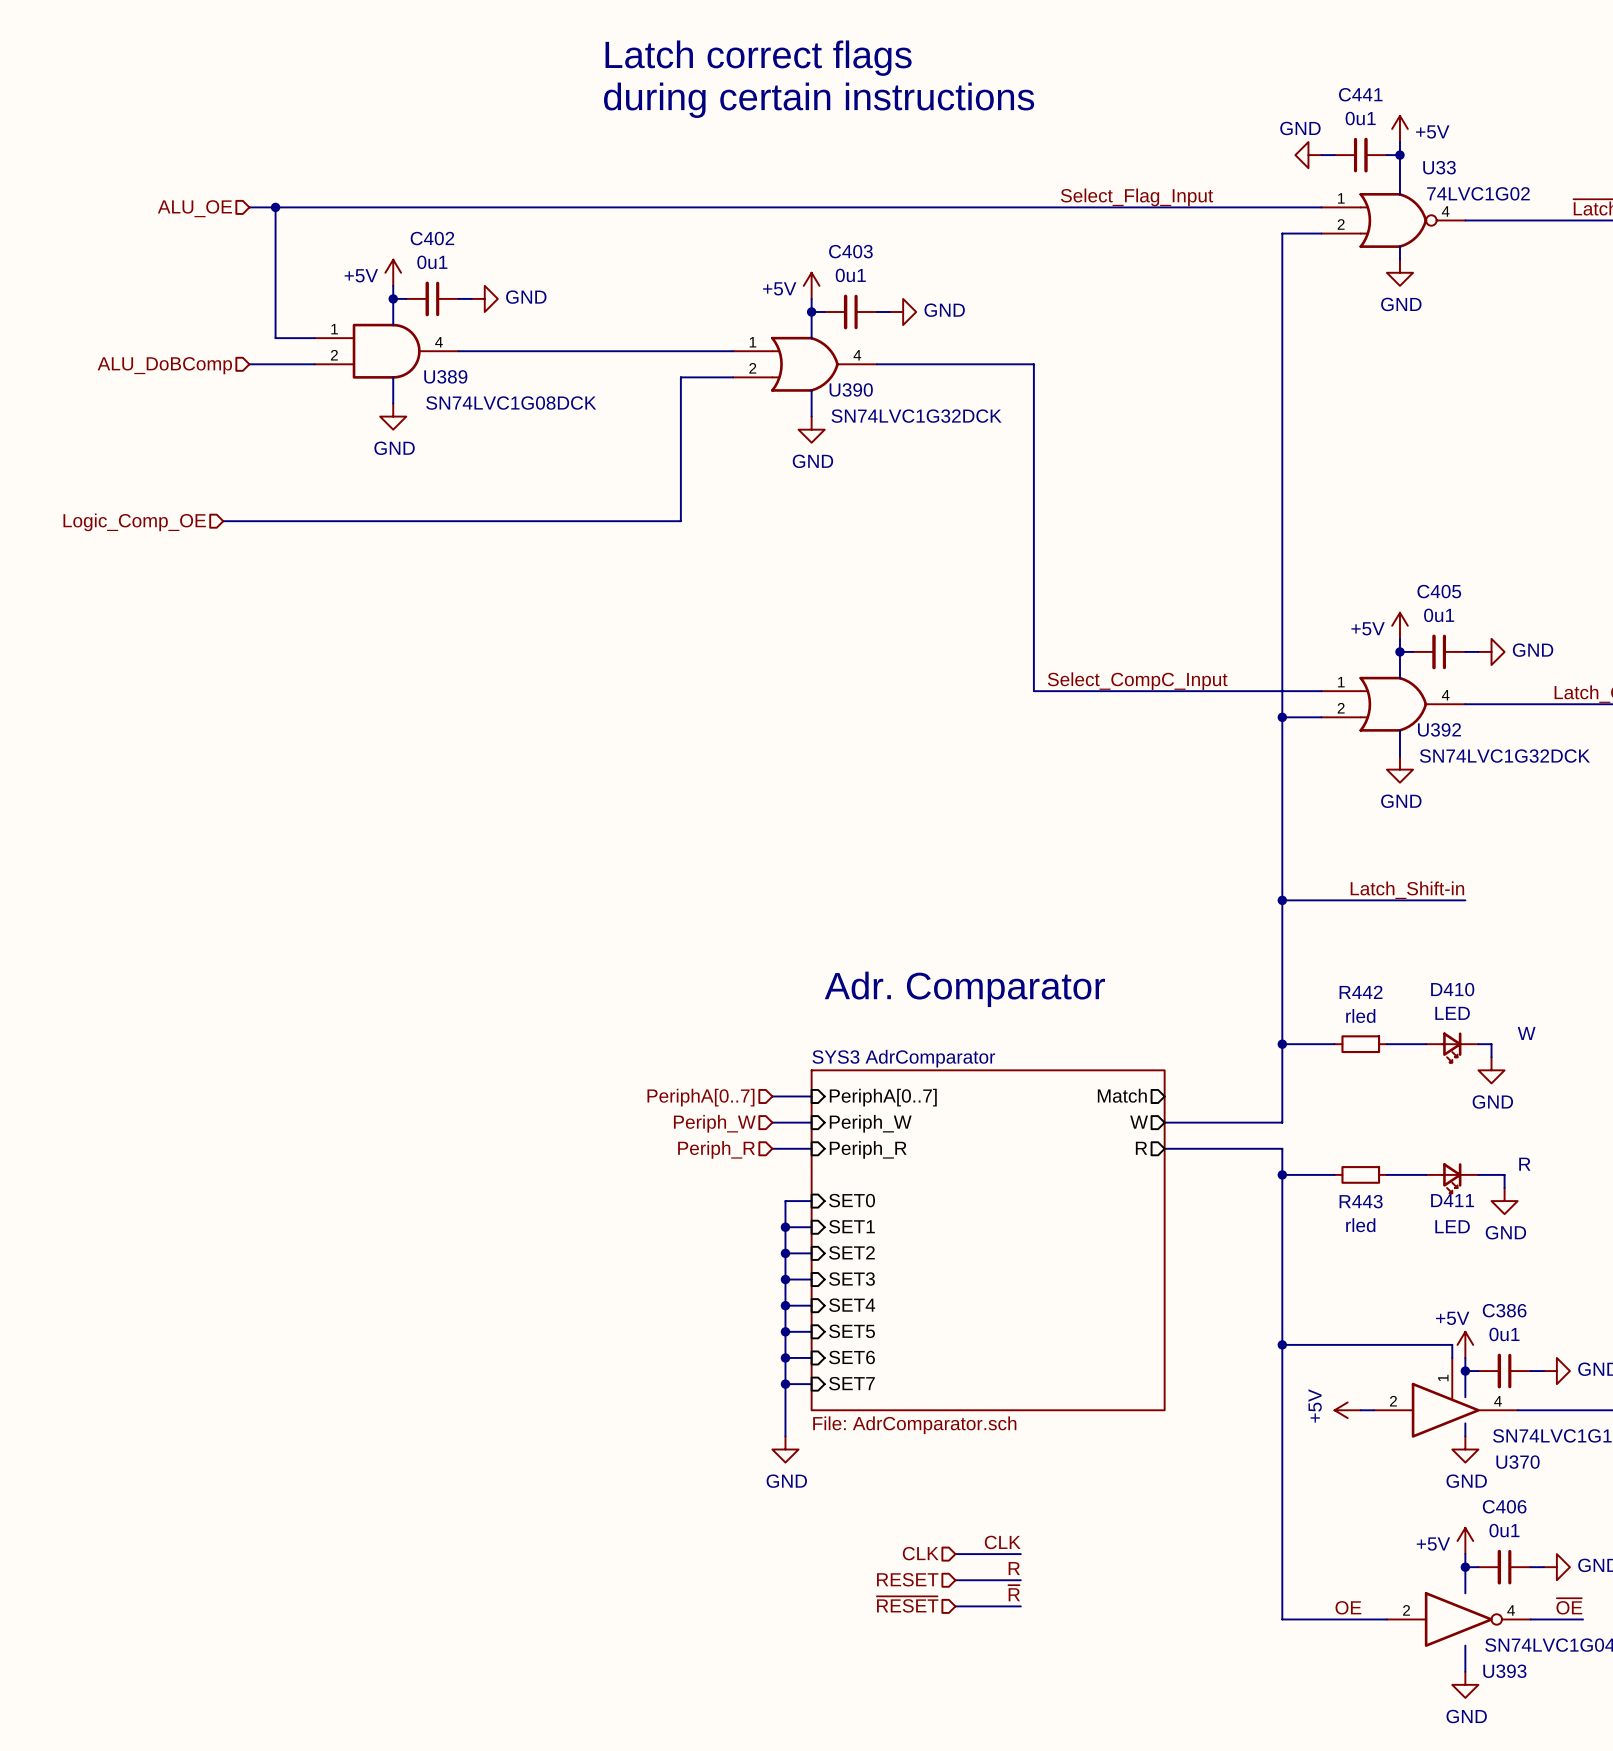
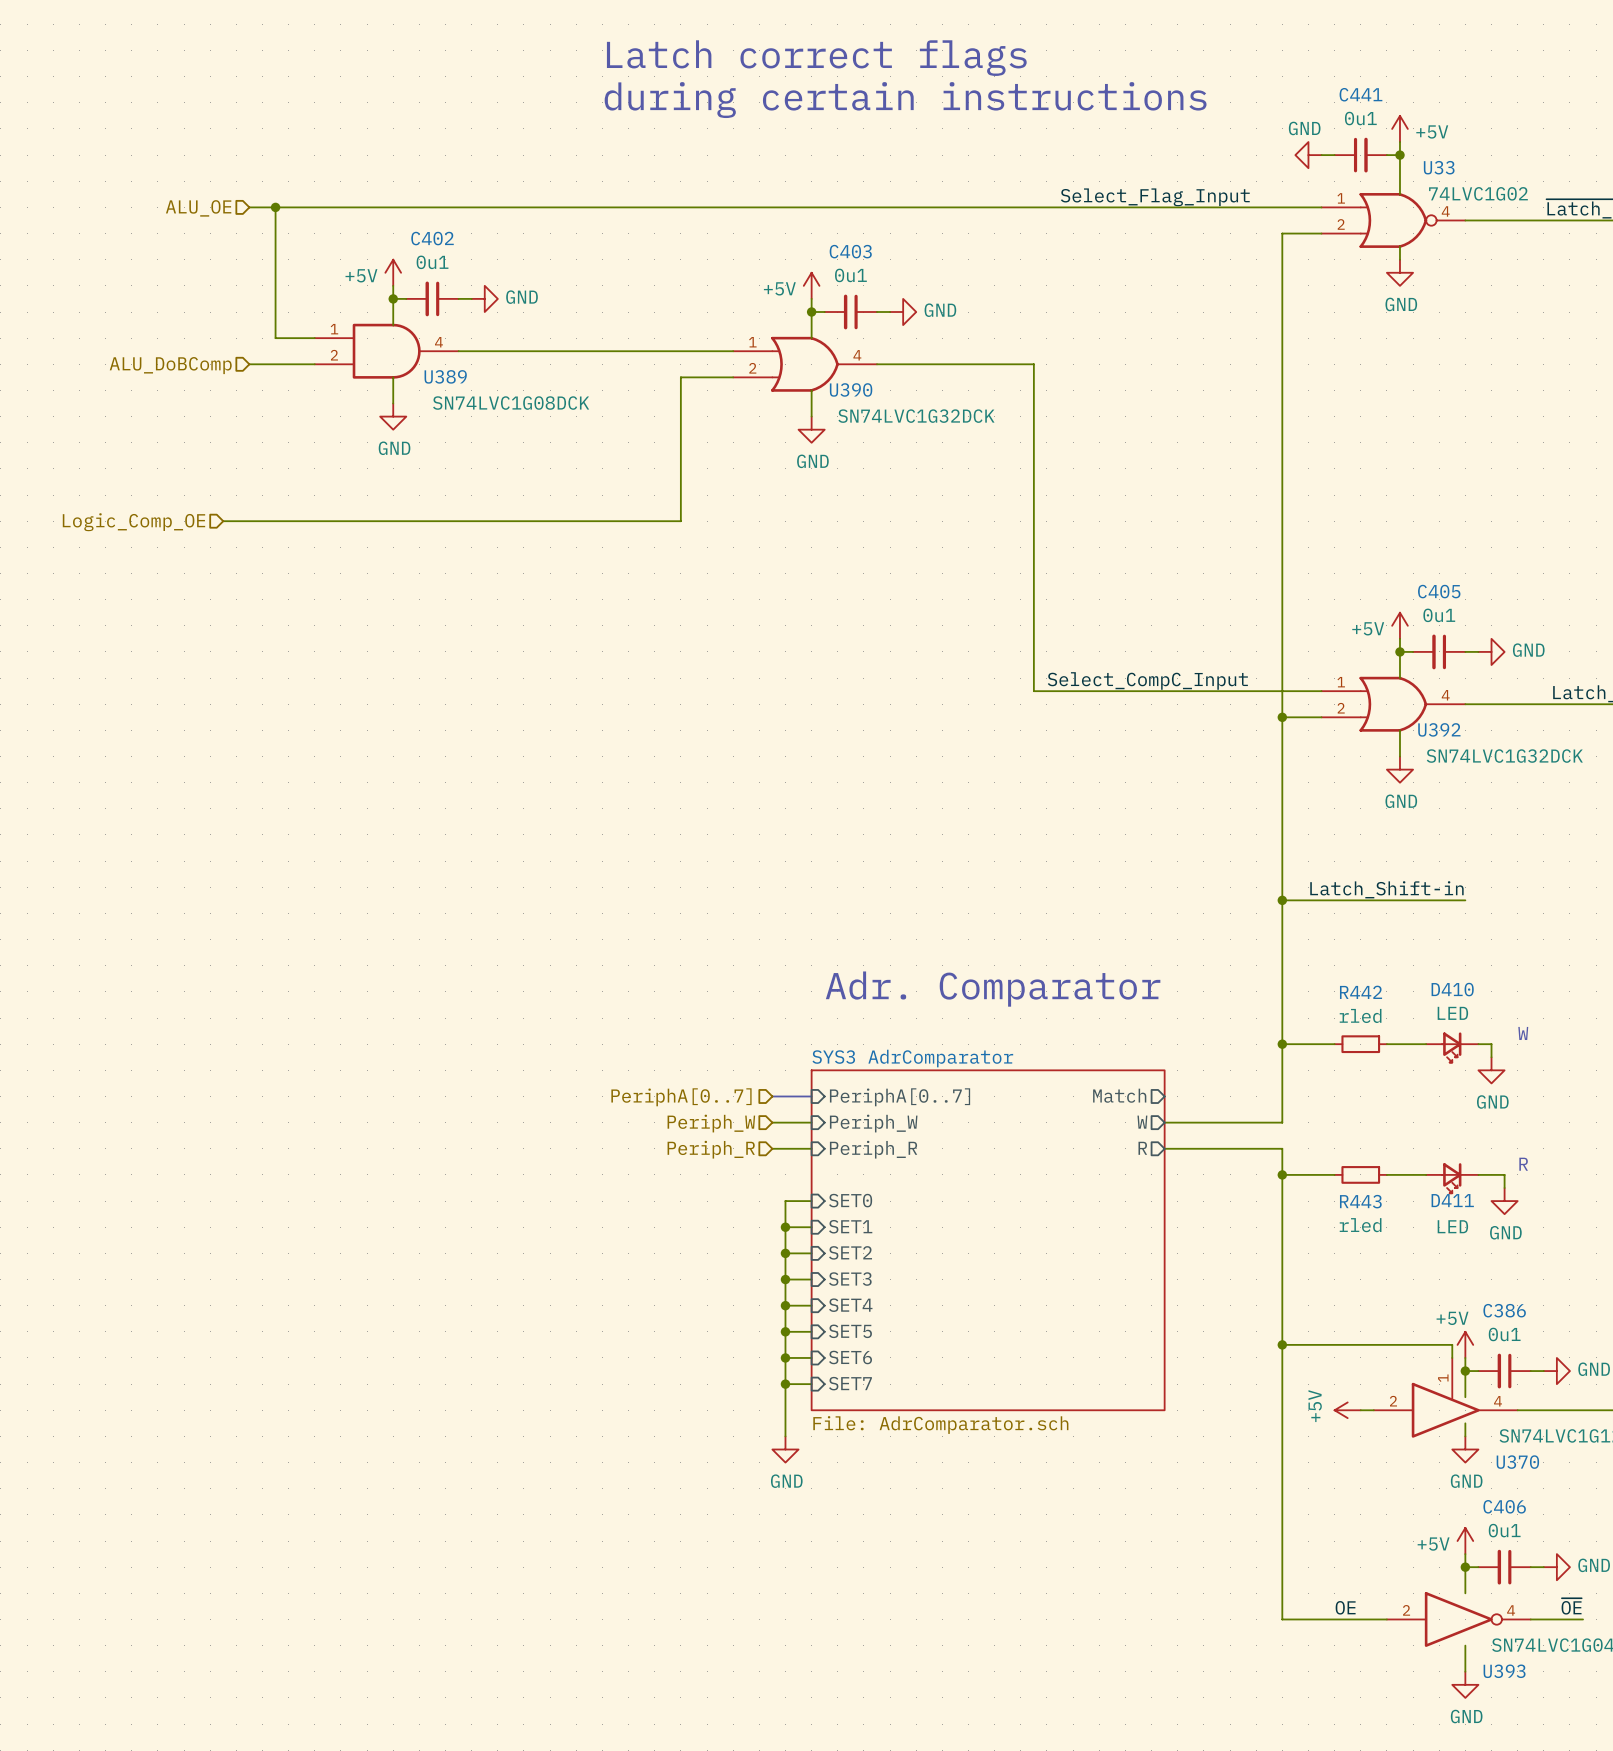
label: CLK (1002, 1542) -> none
hierarchical label: CLK (920, 1553) -> none
wire: (955, 1554) (1020, 1554) -> none
label: R (1014, 1568) -> none
hierarchical label: RESET (907, 1579) -> none
wire: (955, 1580) (1020, 1580) -> none
label: ~{R} (1014, 1593) -> none
hierarchical label: ~{RESET} (907, 1604) -> none
wire: (955, 1606) (1020, 1606) -> none

